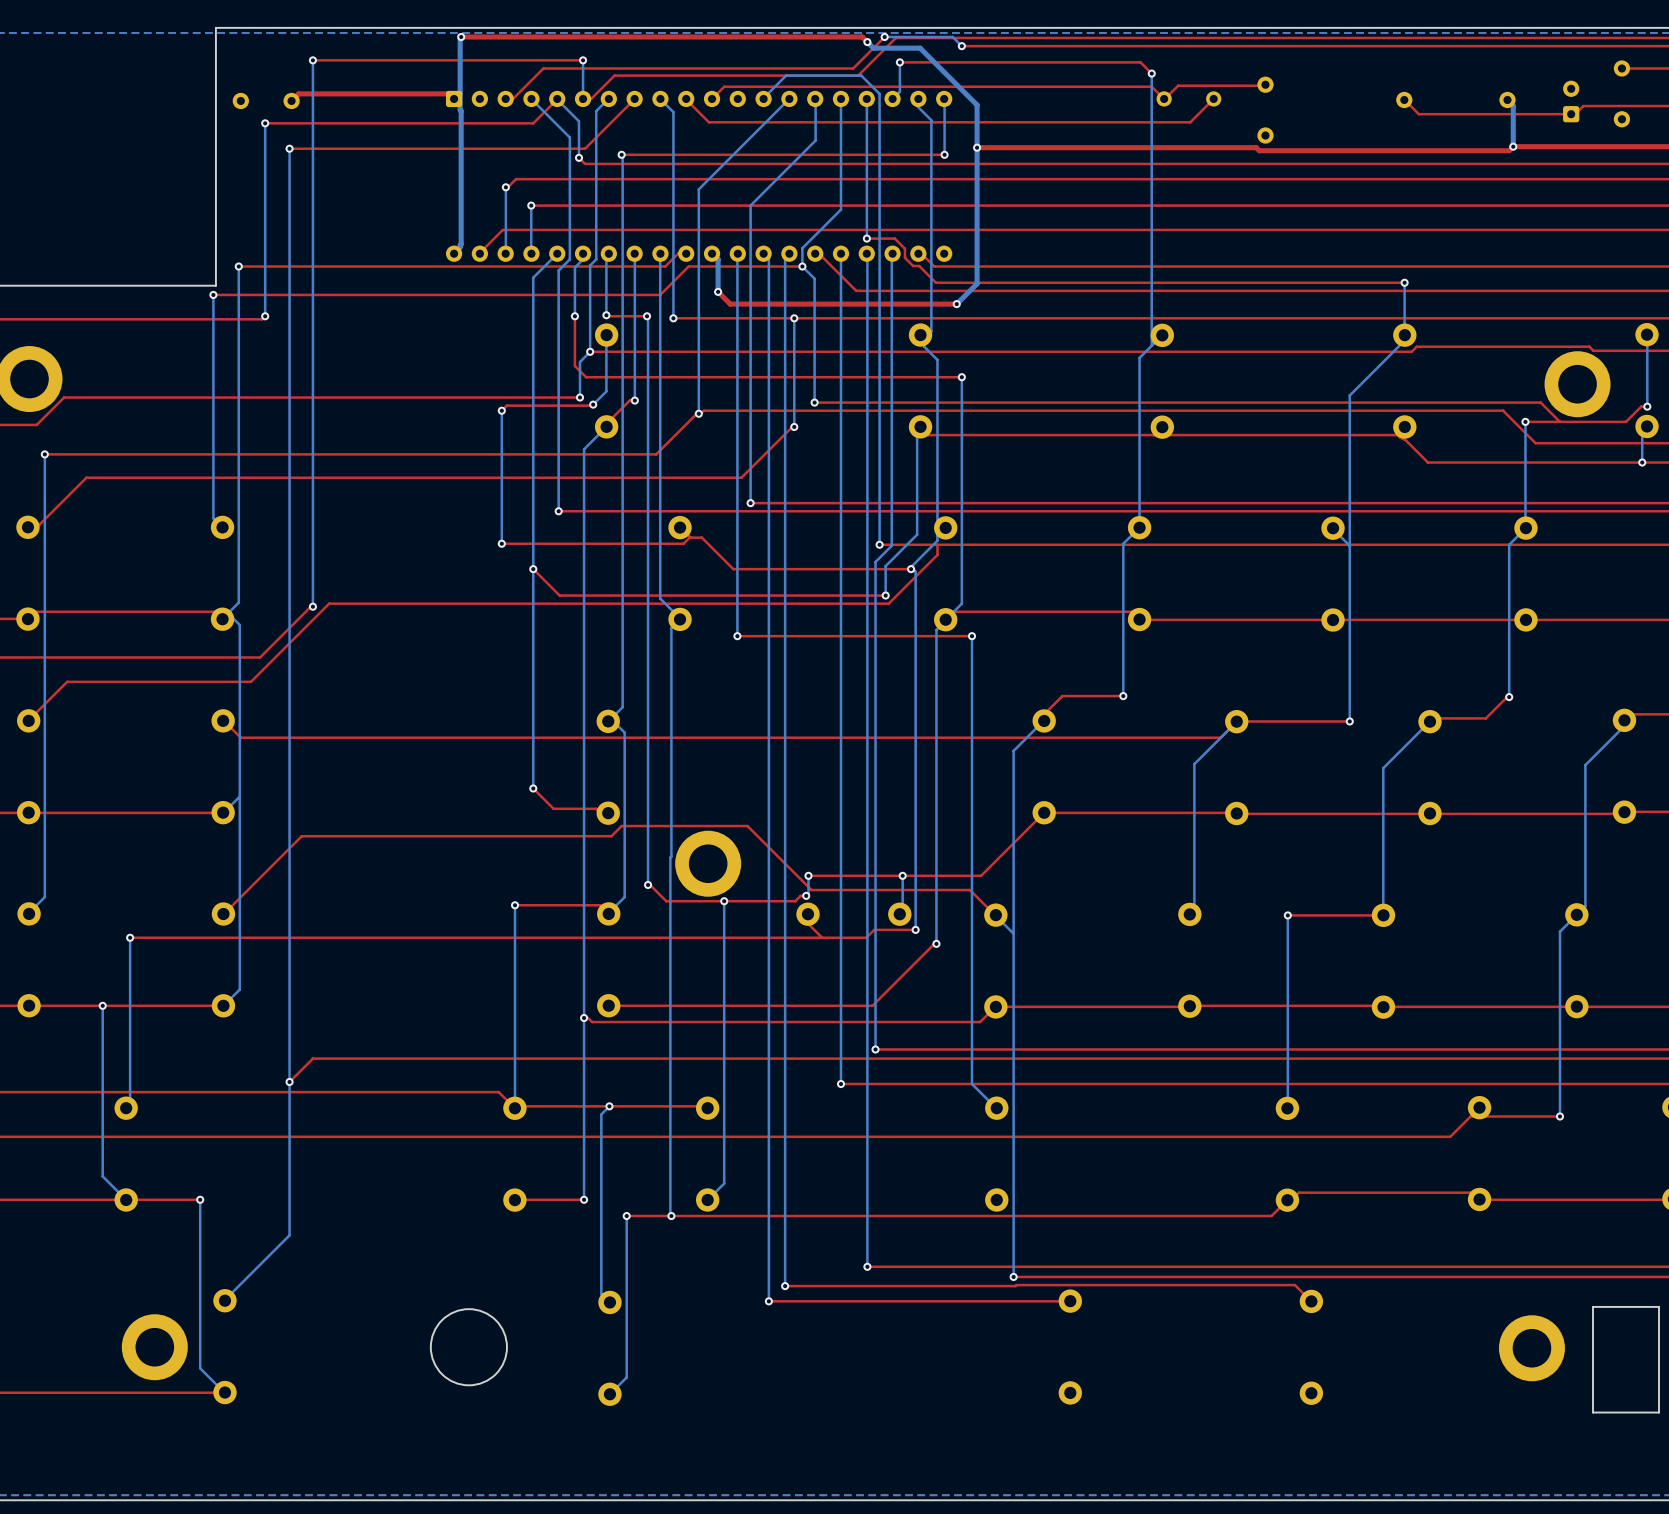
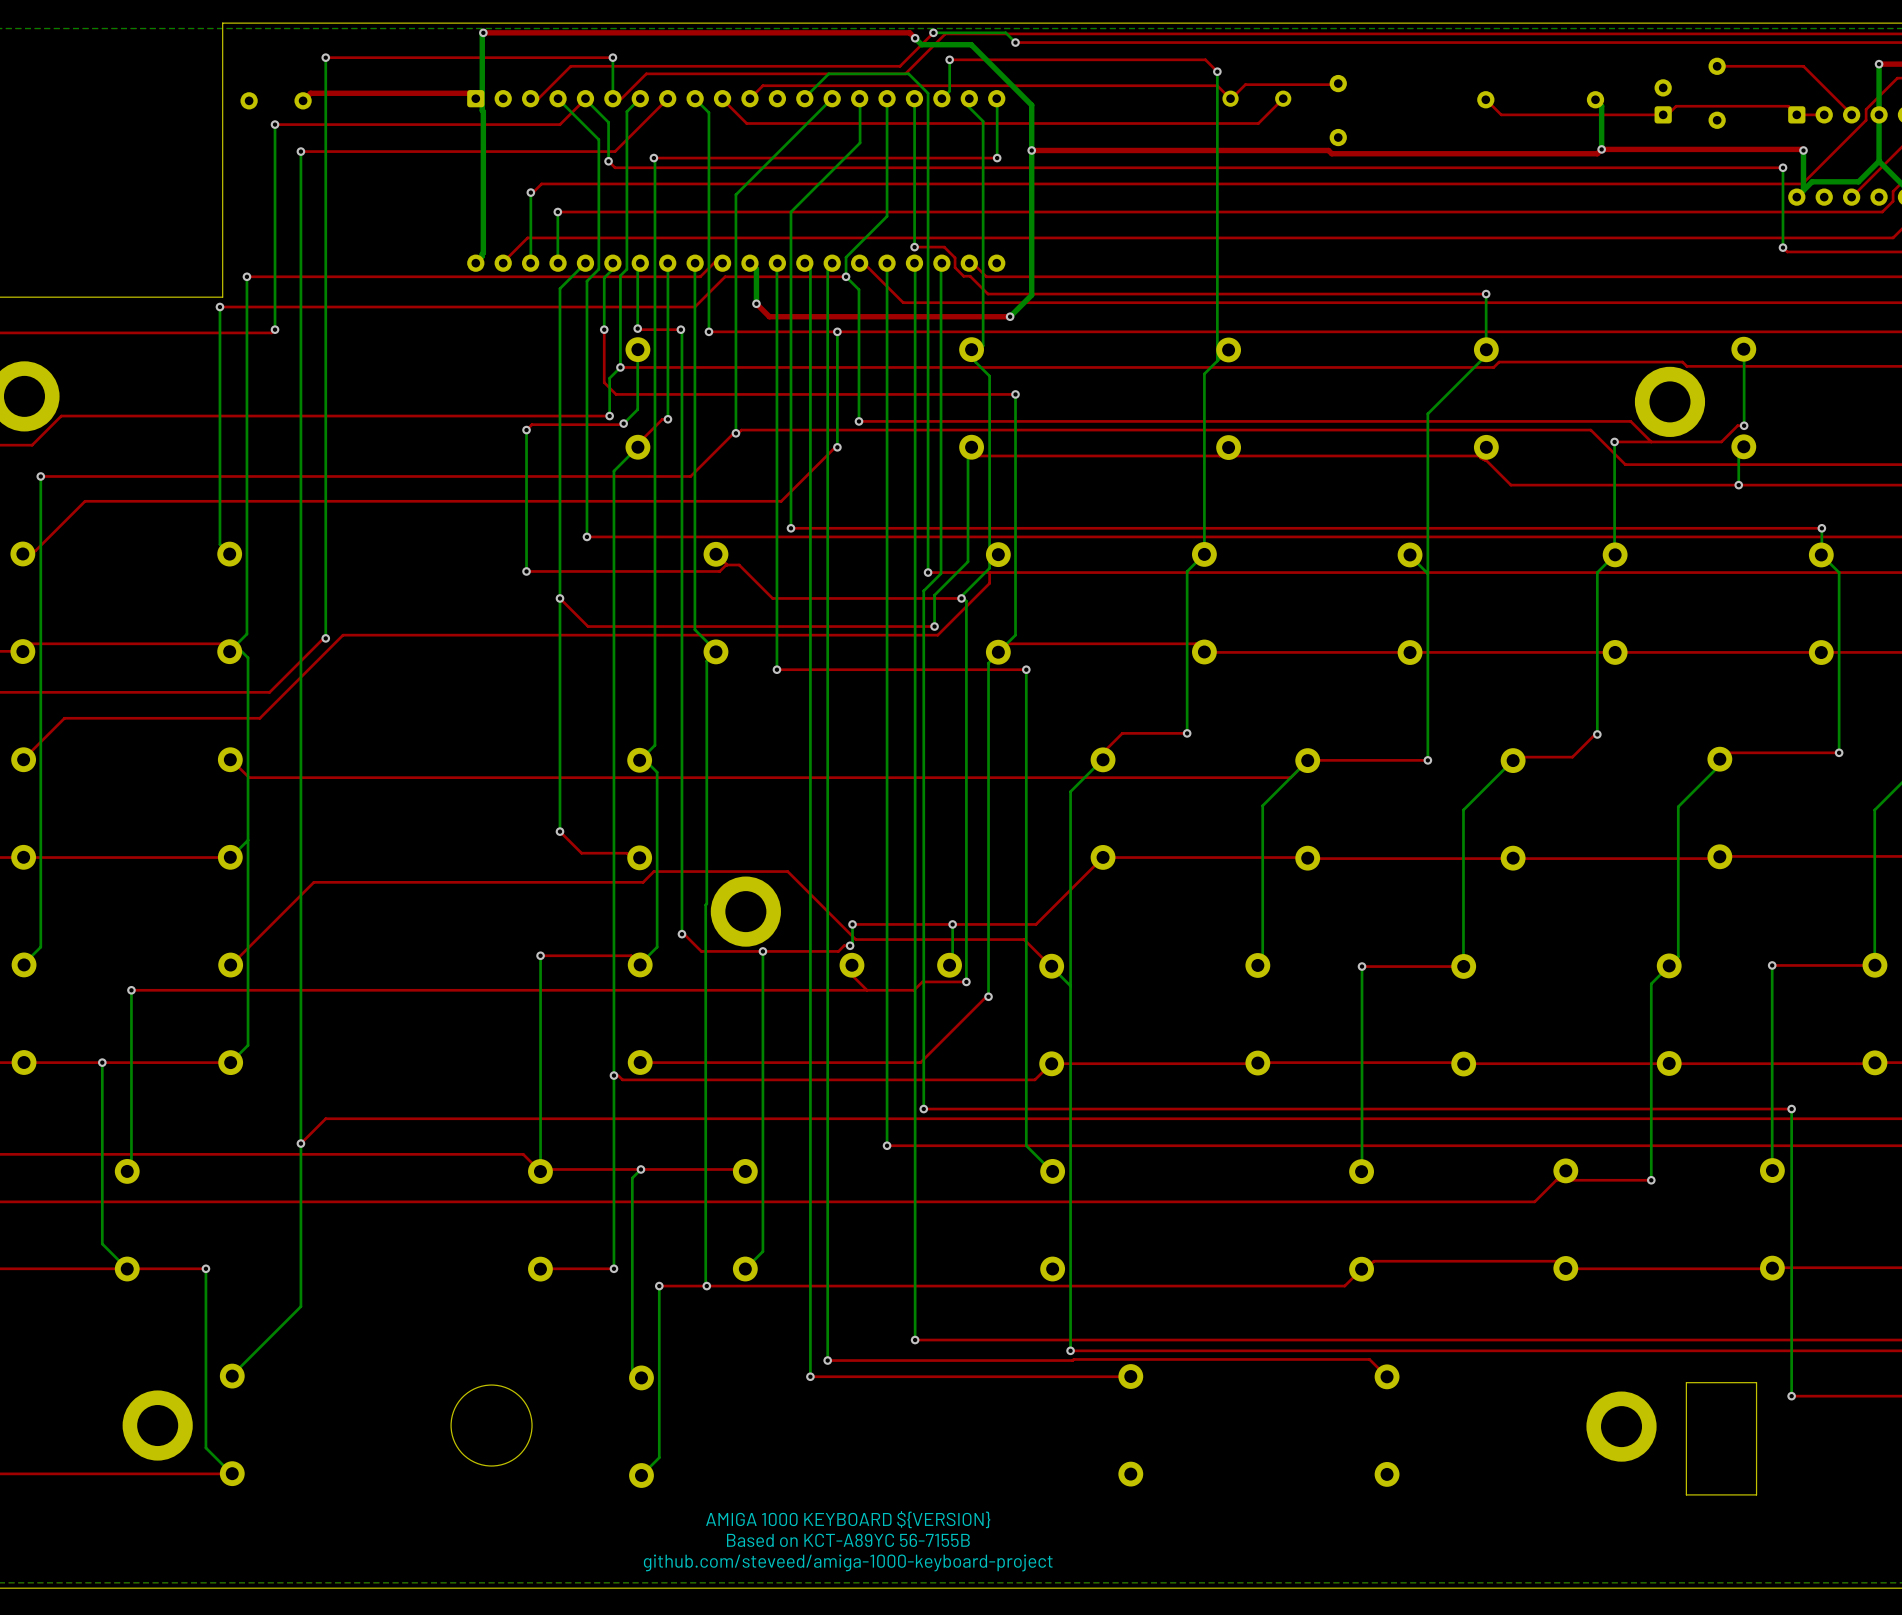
text: none -> AMIGA 1000 KEYBOARD ${VERSION} (848, 1519)
text: none -> Based on KCT-A89YC 56-7155B (848, 1540)
text: none -> github.com/steveed/amiga-1000-keyboard-project (848, 1563)

